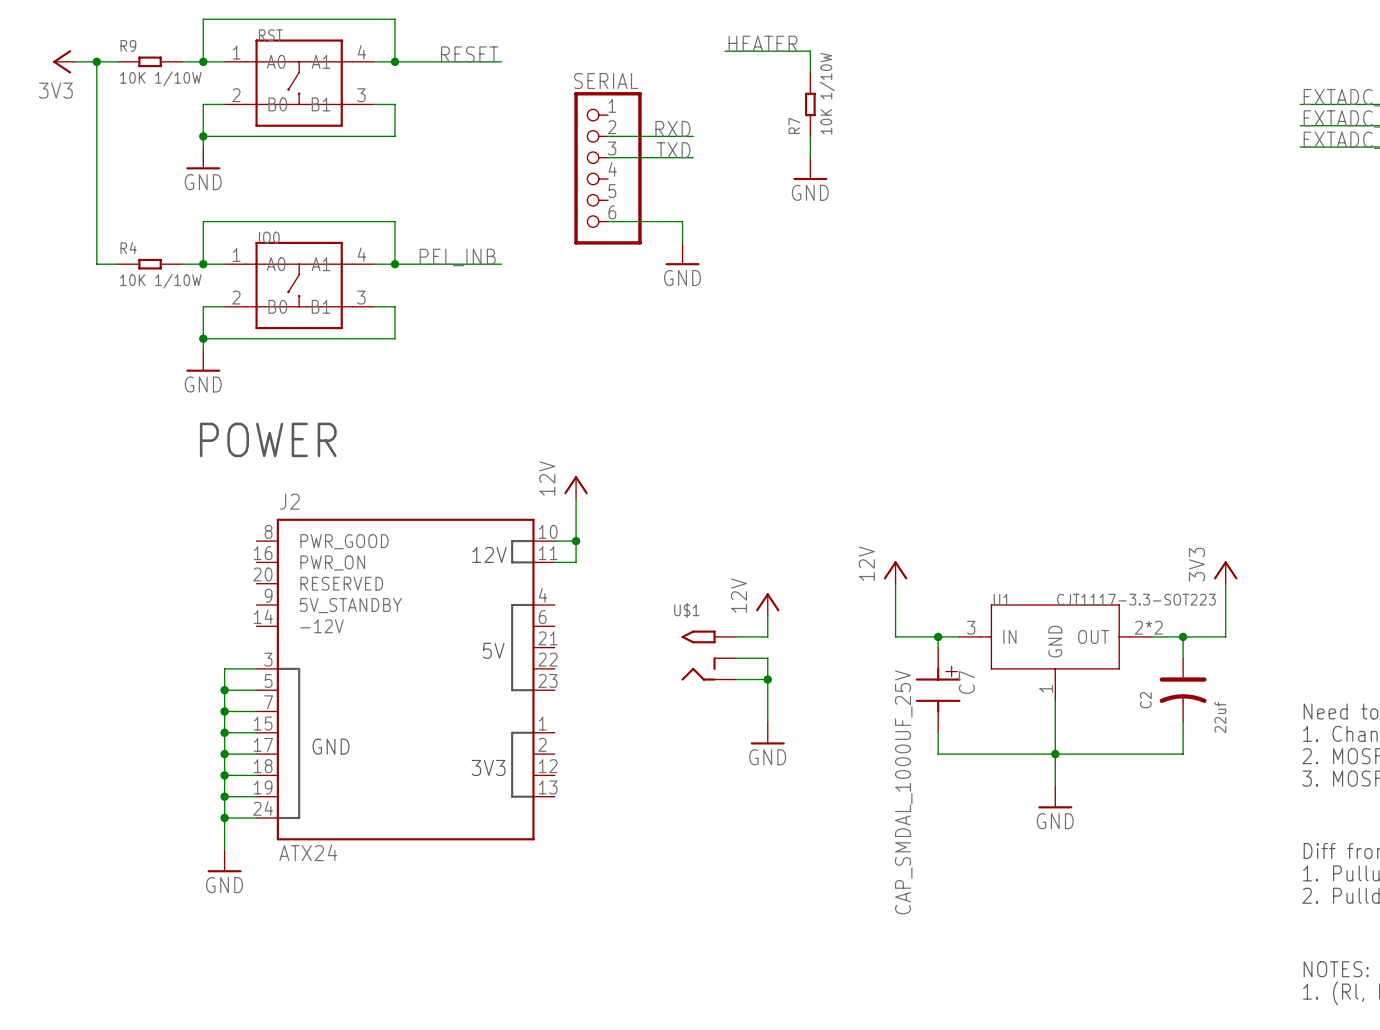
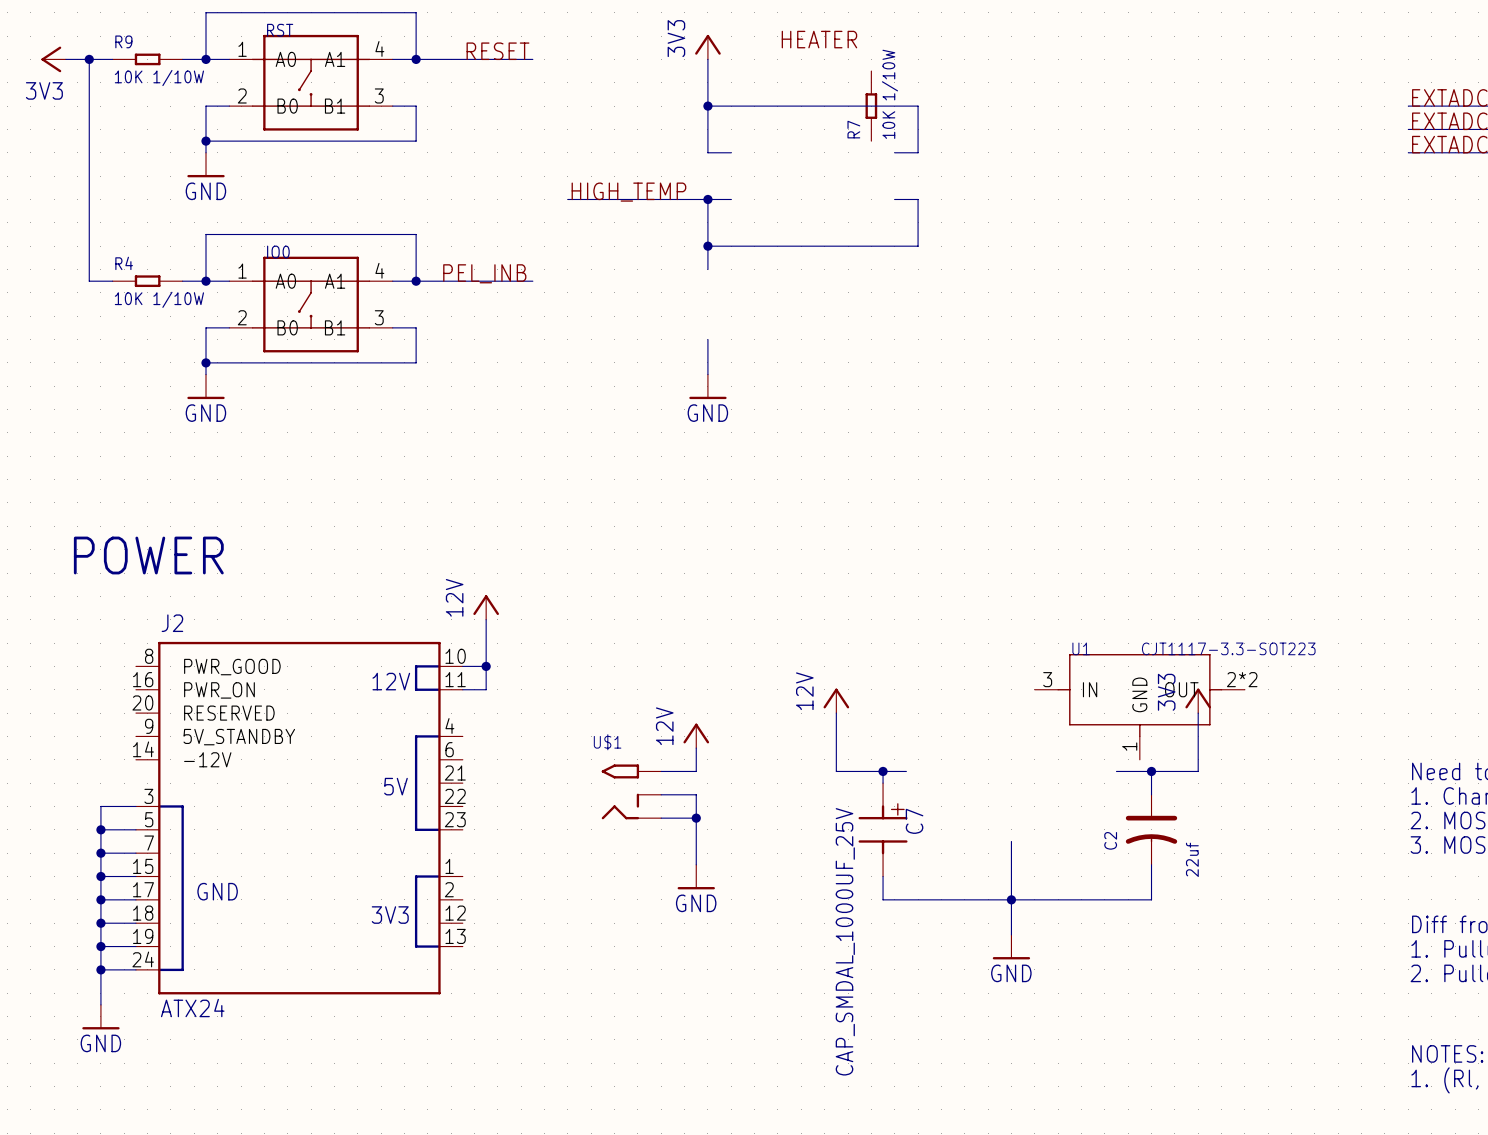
power symbol: none -> 3V3 (707, 47)
wire: (725, 51) (810, 51) (810, 72) -> none
wire: none -> (707, 59) (707, 152) (731, 152)
wire: none -> (707, 106) (918, 106) (918, 152) (894, 152)
junction: none -> (707, 106)
label: RXD (672, 128) -> none
wire: (608, 136) (693, 136) -> none
wire: (810, 136) (810, 157) -> none
label: TXD (673, 150) -> none
wire: (608, 157) (693, 157) -> none
SERIAL: (608, 168) -> none
power symbol: GND (810, 168) -> none
label: none -> HIGH_TEMP (628, 192)
wire: none -> (567, 199) (731, 199)
wire: none -> (707, 199) (707, 269)
junction: none -> (707, 199)
wire: none -> (894, 199) (918, 199) (918, 246) (707, 246)
wire: (608, 221) (682, 221) (682, 242) -> none
junction: none -> (707, 246)
power symbol position: GND (682, 254) -> GND (707, 386)
wire: none -> (707, 339) (707, 374)
text position: POWER (268, 439) -> POWER (148, 555)
power symbol: 12V (576, 487) -> none
wire: (576, 498) (576, 562) (554, 562) -> (486, 619) (486, 689) (462, 689)
wire: (554, 541) (576, 541) -> (462, 666) (486, 666)
junction: (576, 541) -> none
power symbol: none -> 12V (486, 607)
power symbol: 12V (895, 572) -> none
power symbol position: 3V3 (1225, 572) -> 3V3 (1198, 700)
wire: (895, 583) (895, 636) (959, 636) -> (836, 713) (836, 771) (906, 771)
wire: (1225, 583) (1225, 636) (1151, 636) -> (1198, 713) (1198, 771) (1116, 771)
power symbol position: 12V (767, 604) -> 12V (836, 700)
junction: none -> (486, 666)
wire: (767, 615) (767, 636) (735, 636) -> (696, 748) (696, 771) (661, 771)
wire: (938, 636) (938, 647) -> (883, 771) (883, 783)
junction: (938, 636) -> none
wire: (1183, 636) (1183, 658) -> (1151, 771) (1151, 794)
junction: (1183, 636) -> none
U$1 position: (708, 655) -> (631, 791)
wire: (735, 658) (767, 658) (767, 722) -> (661, 794) (696, 794) (696, 864)
wire: (256, 668) (224, 668) (224, 849) -> (135, 806) (100, 806) (100, 1004)
J2 position: (405, 679) -> (299, 818)
power symbol: none -> 12V (696, 735)
wire: (735, 679) (767, 679) -> (661, 818) (696, 818)
junction: (767, 679) -> none
wire: (224, 690) (256, 690) -> (100, 829) (135, 829)
junction: (224, 690) -> none
C7 position: (938, 690) -> (883, 829)
C2 position: (1183, 690) -> (1151, 829)
wire: (1055, 700) (1055, 786) -> (1011, 841) (1011, 934)
wire: (224, 711) (256, 711) -> (100, 853) (135, 853)
junction: (224, 711) -> none
junction: none -> (883, 771)
wire: (1183, 722) (1183, 754) (938, 754) (938, 732) -> (1151, 864) (1151, 899) (883, 899) (883, 876)
wire: (224, 732) (256, 732) -> (100, 876) (135, 876)
junction: (224, 732) -> none
power symbol: GND (767, 733) -> none
wire: (224, 754) (256, 754) -> (100, 899) (135, 899)
junction: (224, 754) -> none
junction: none -> (696, 818)
junction position: (1055, 754) -> (1151, 771)
junction: none -> (100, 829)
wire: (224, 775) (256, 775) -> (100, 923) (135, 923)
junction: (224, 775) -> none
junction: none -> (100, 853)
wire: (224, 796) (256, 796) -> (100, 946) (135, 946)
junction: (224, 796) -> none
power symbol: GND (1055, 797) -> none
junction: none -> (100, 876)
power symbol: none -> GND (696, 877)
wire: (224, 817) (256, 817) -> (100, 969) (135, 969)
junction: (224, 817) -> none
junction: none -> (100, 899)
junction: none -> (1011, 899)
junction: none -> (100, 923)
power symbol position: GND (224, 861) -> GND (100, 1017)
junction: none -> (100, 946)
power symbol: none -> GND (1011, 947)
junction: none -> (100, 969)

